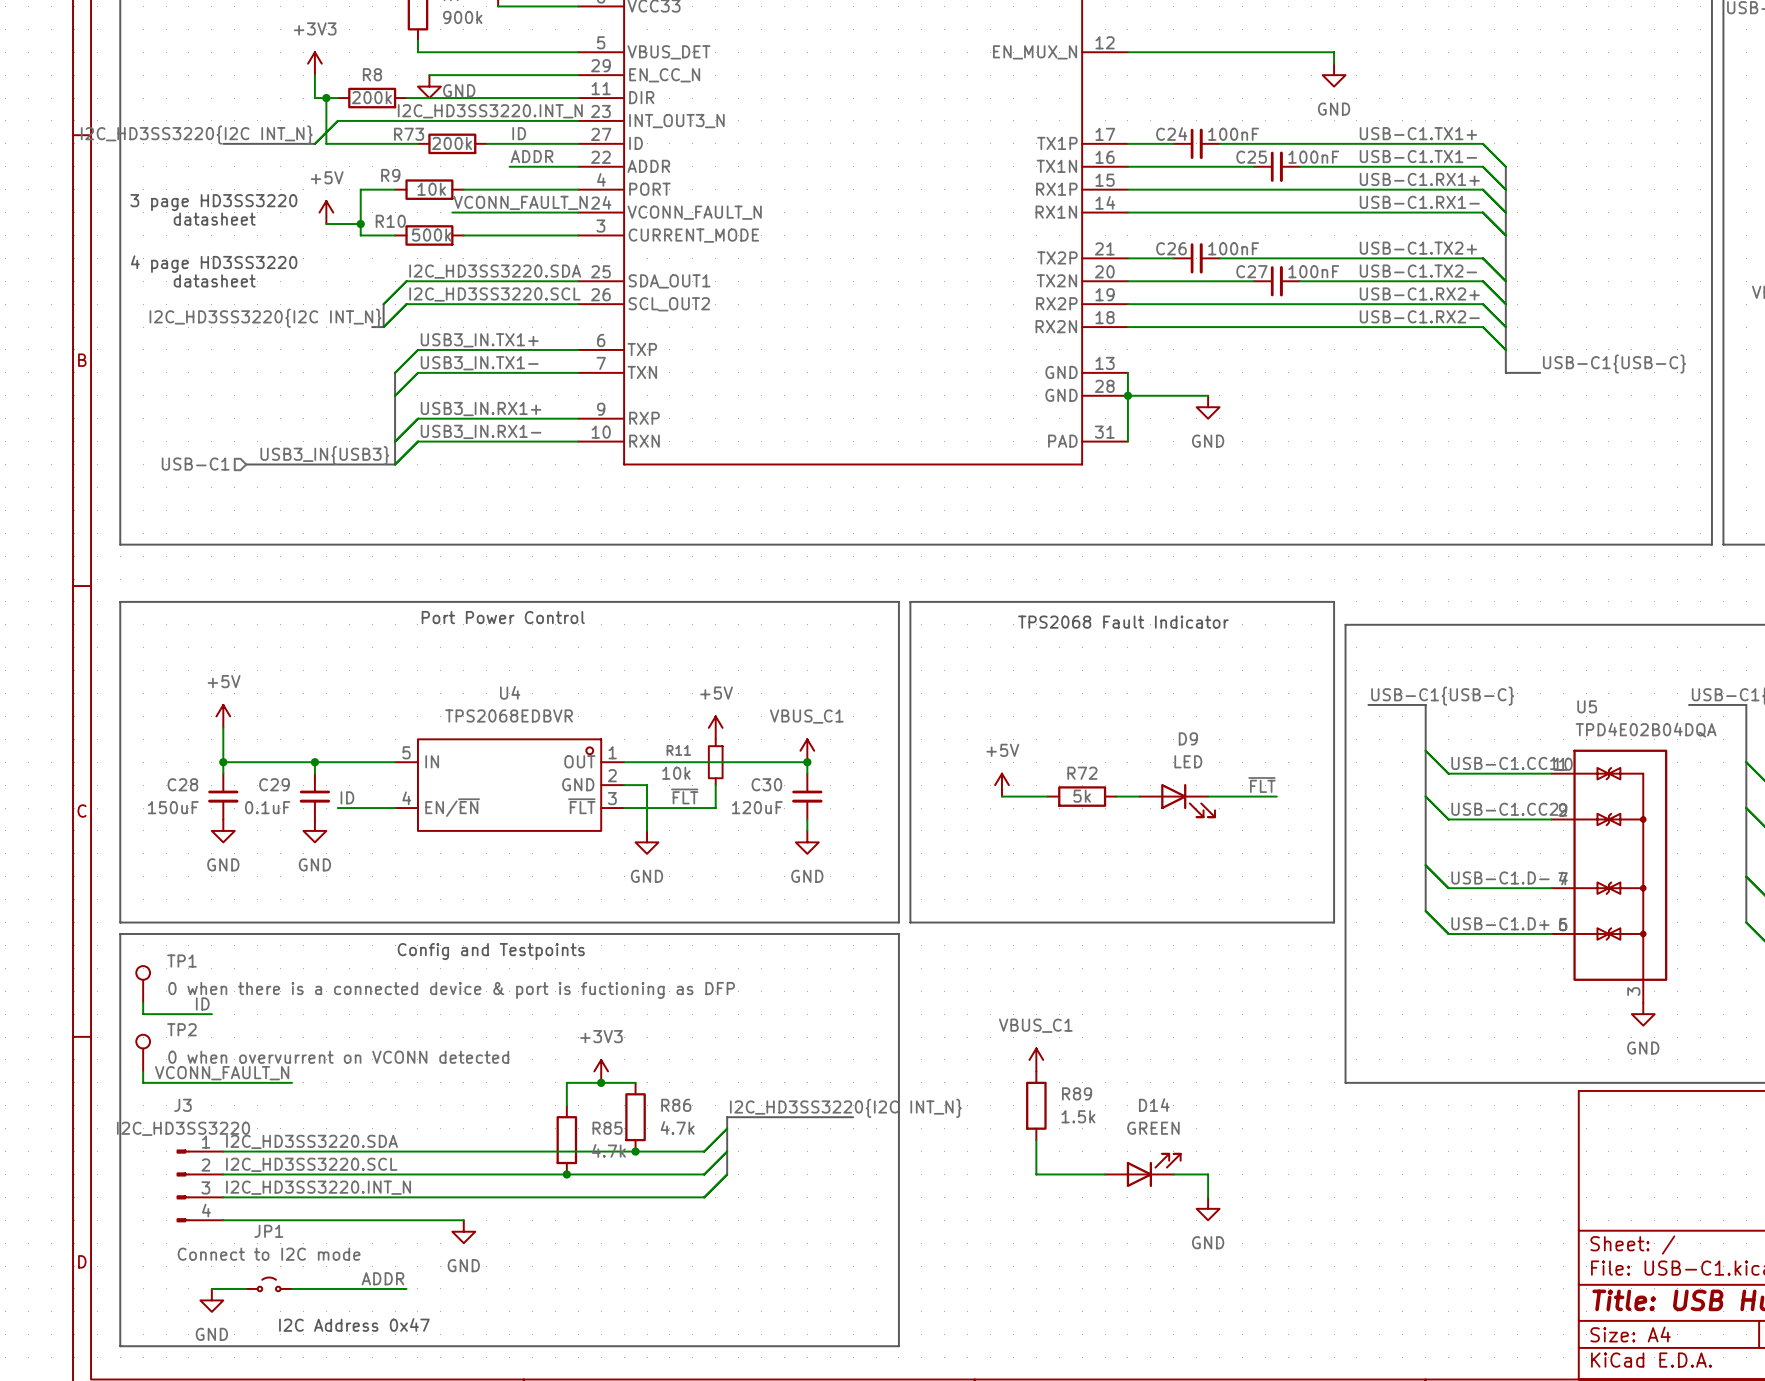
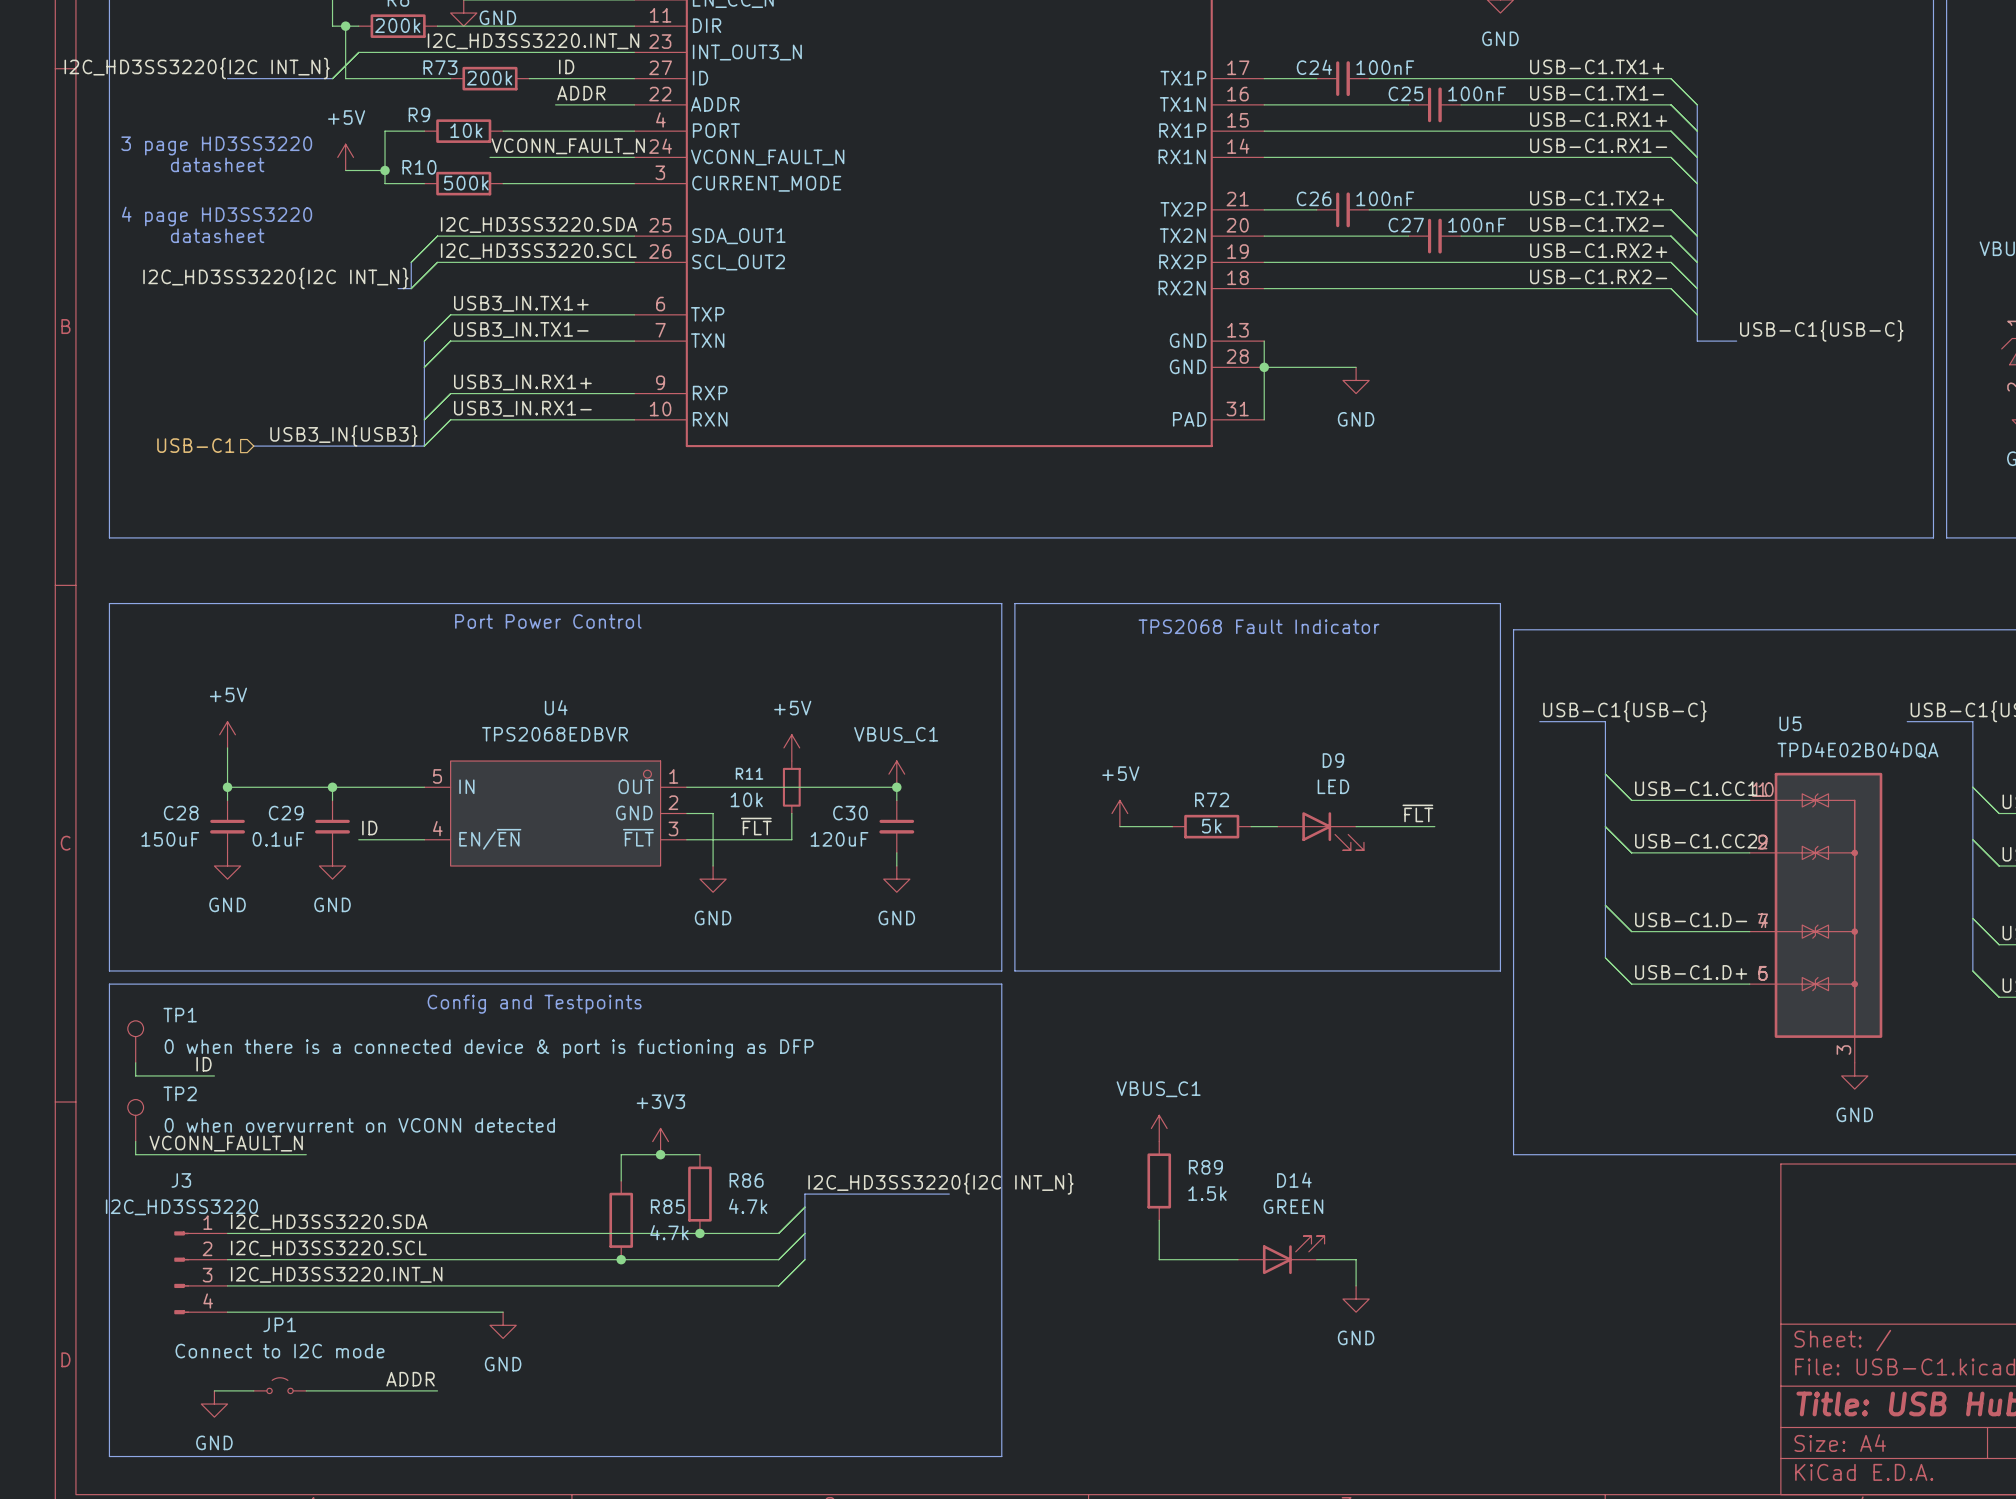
text: I2C Address 0x47 (354, 1324) -> none

